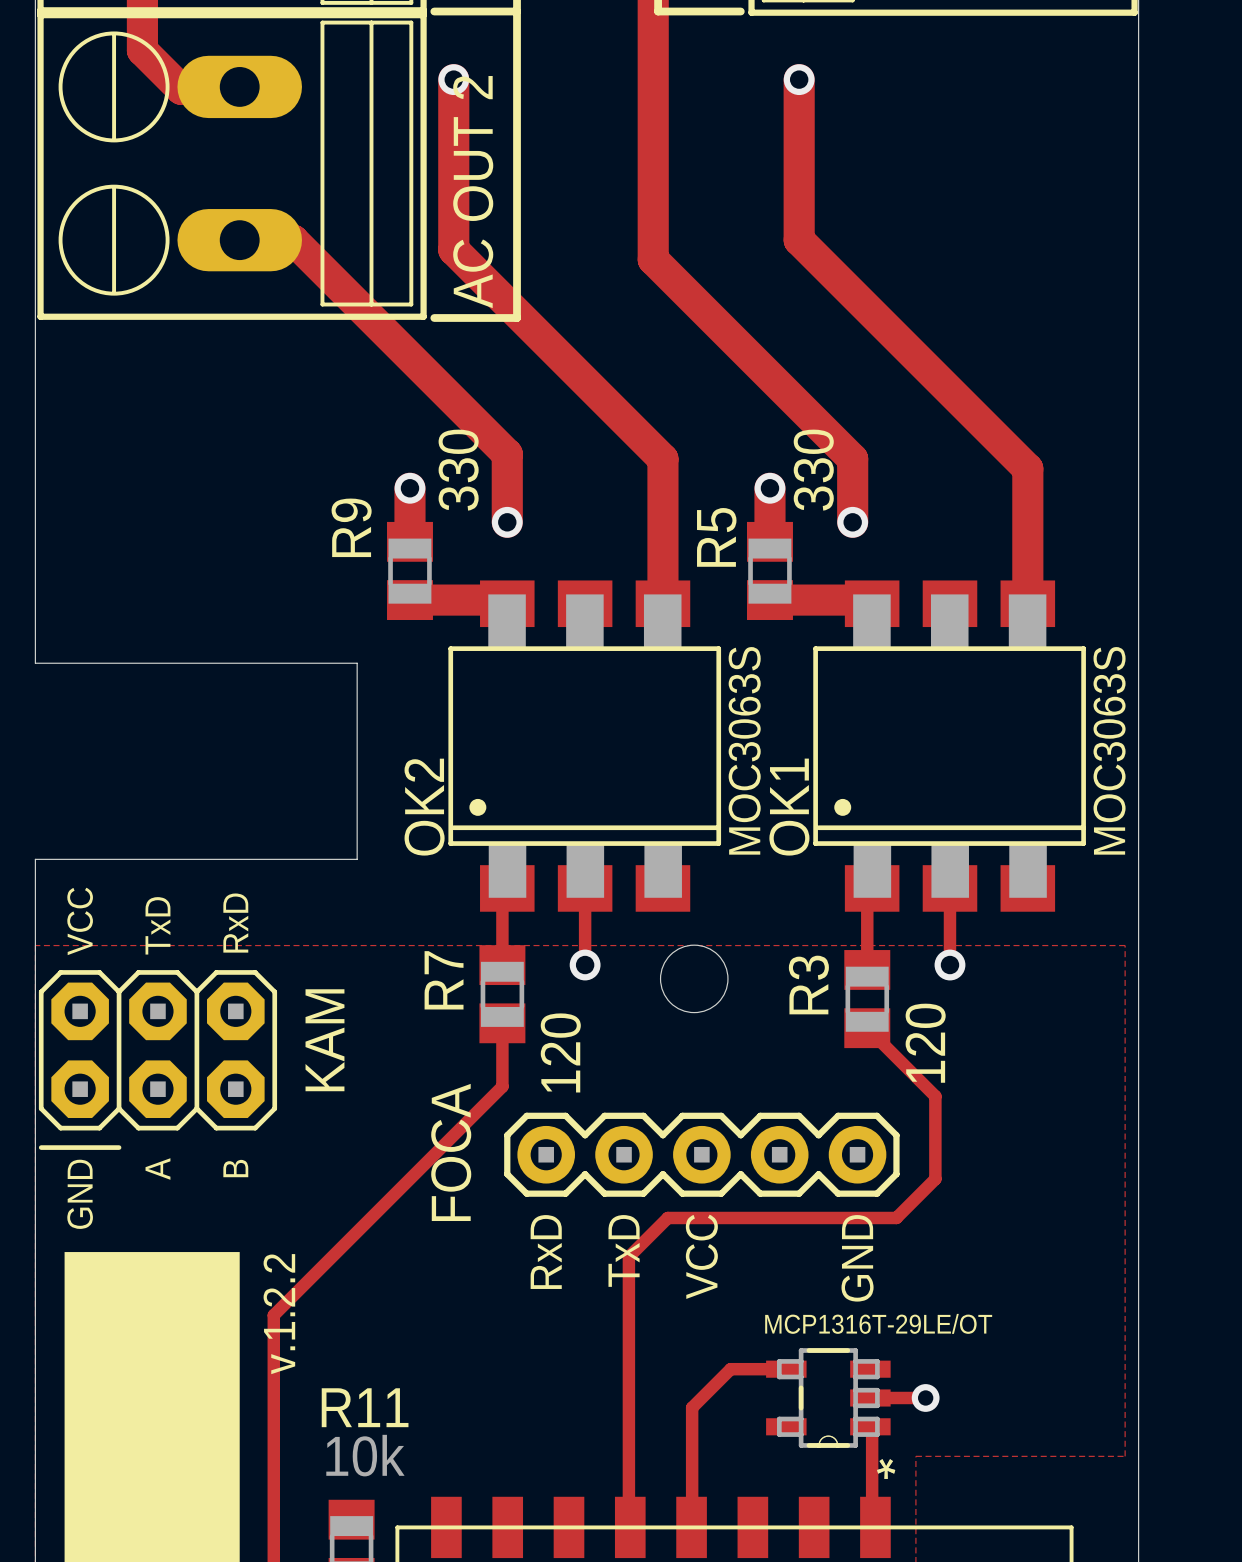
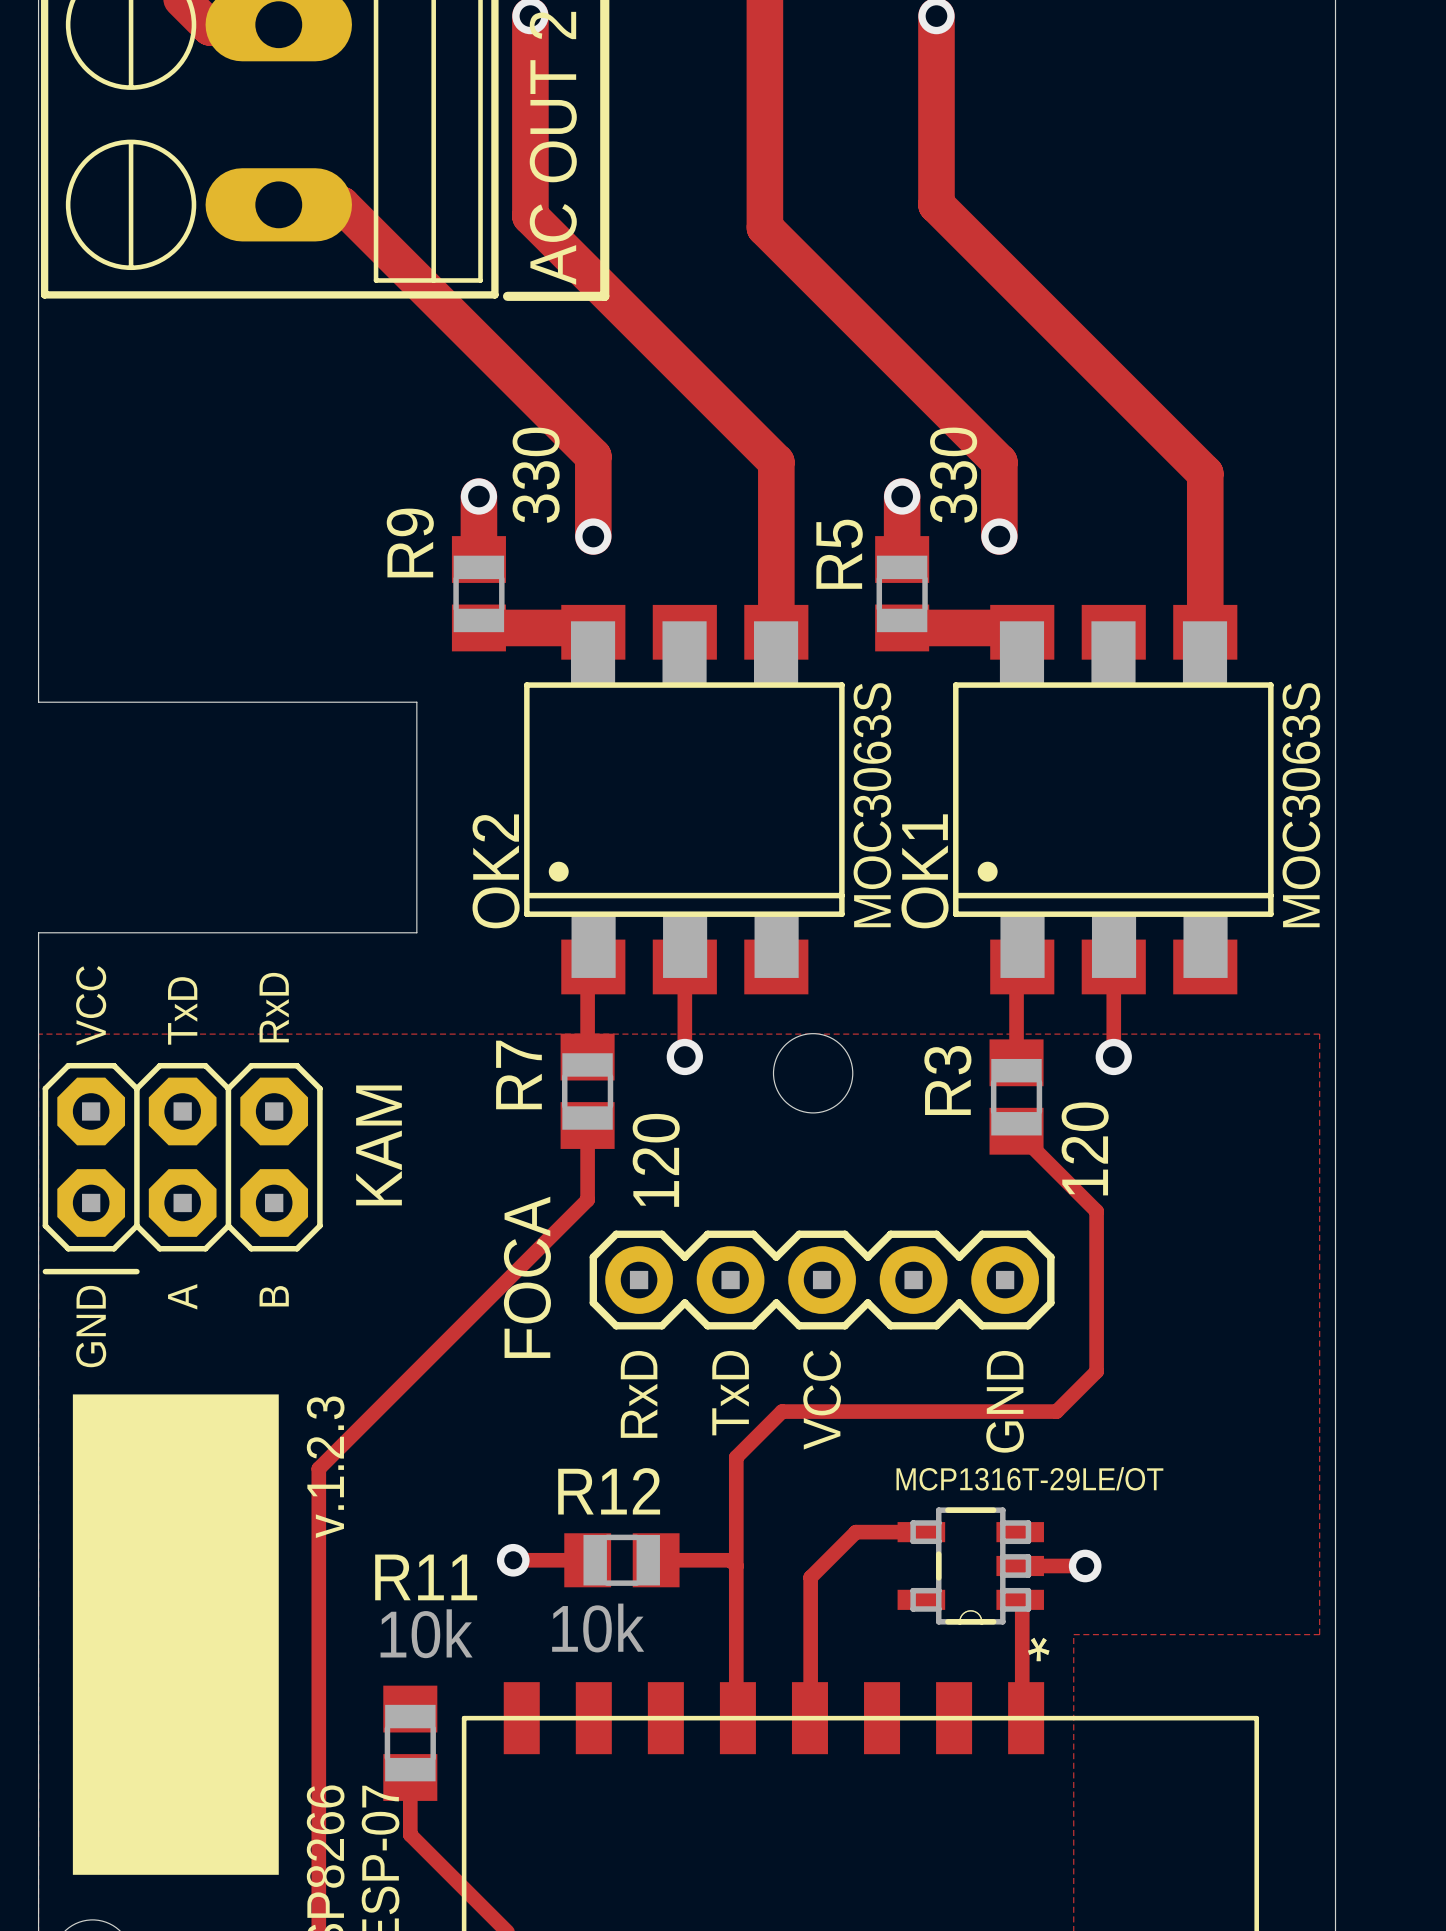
track: (935, 1179) (896, 1217) (667, 1217) (628, 1256) (628, 1305) -> (1096, 1308) (1096, 1371) (1056, 1411) (782, 1411) (736, 1457)
text: v.1.2.2 (279, 1314) -> v.1.2.3 (325, 1467)
track: none -> (513, 1560) (587, 1560)
via: none -> (513, 1560)
R12: none -> 10k (621, 1560)
track: none -> (656, 1560) (730, 1560) (736, 1565)

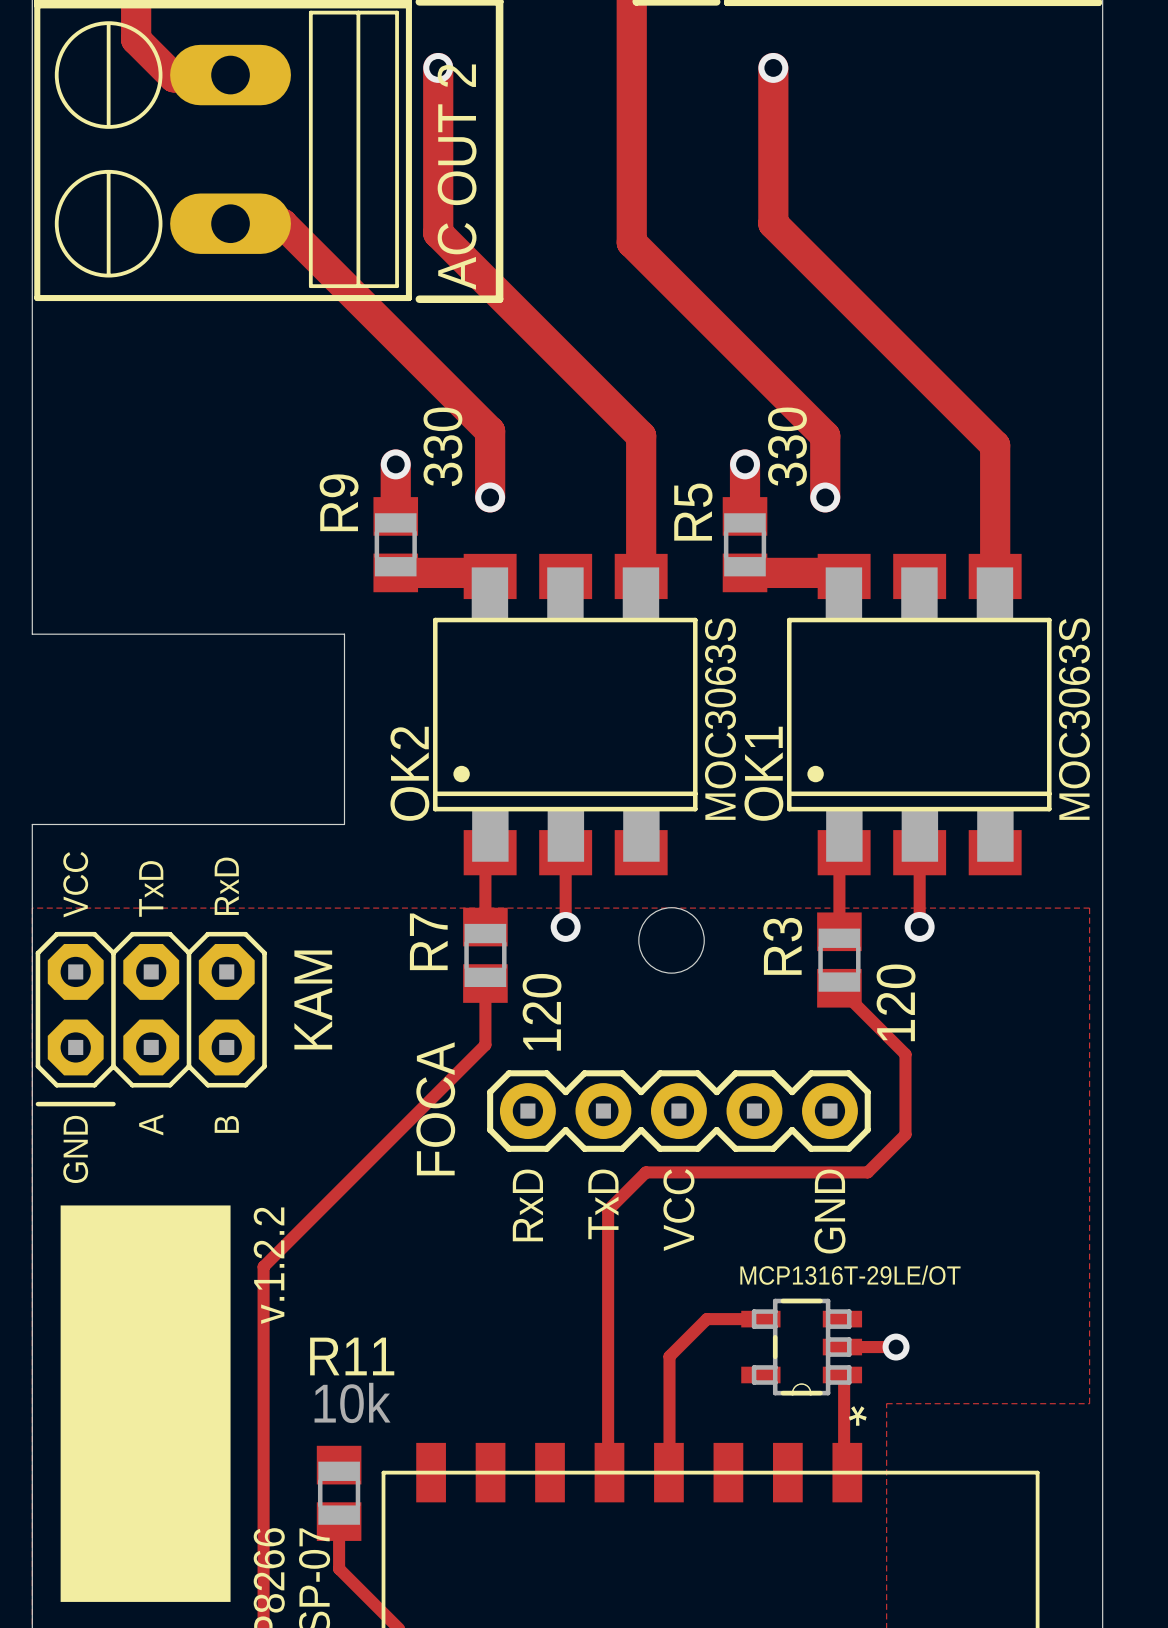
track: (1096, 1308) (1096, 1371) (1056, 1411) (782, 1411) (736, 1457) -> (905, 1134) (867, 1172) (645, 1172) (608, 1210) (608, 1257)
text: v.1.2.3 (325, 1467) -> v.1.2.2 (269, 1265)
track: (513, 1560) (587, 1560) -> none
via: (513, 1560) -> none
R12: 10k (621, 1560) -> none
track: (656, 1560) (730, 1560) (736, 1565) -> none

